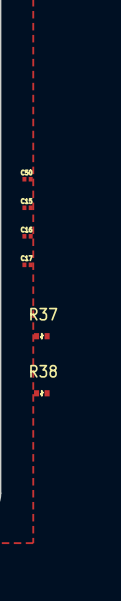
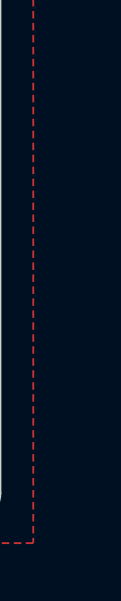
part: (27, 179) -> none
part: (27, 207) -> none
part: (27, 236) -> none
part: (27, 264) -> none
R37: (41, 336) -> none
R38: (41, 393) -> none

